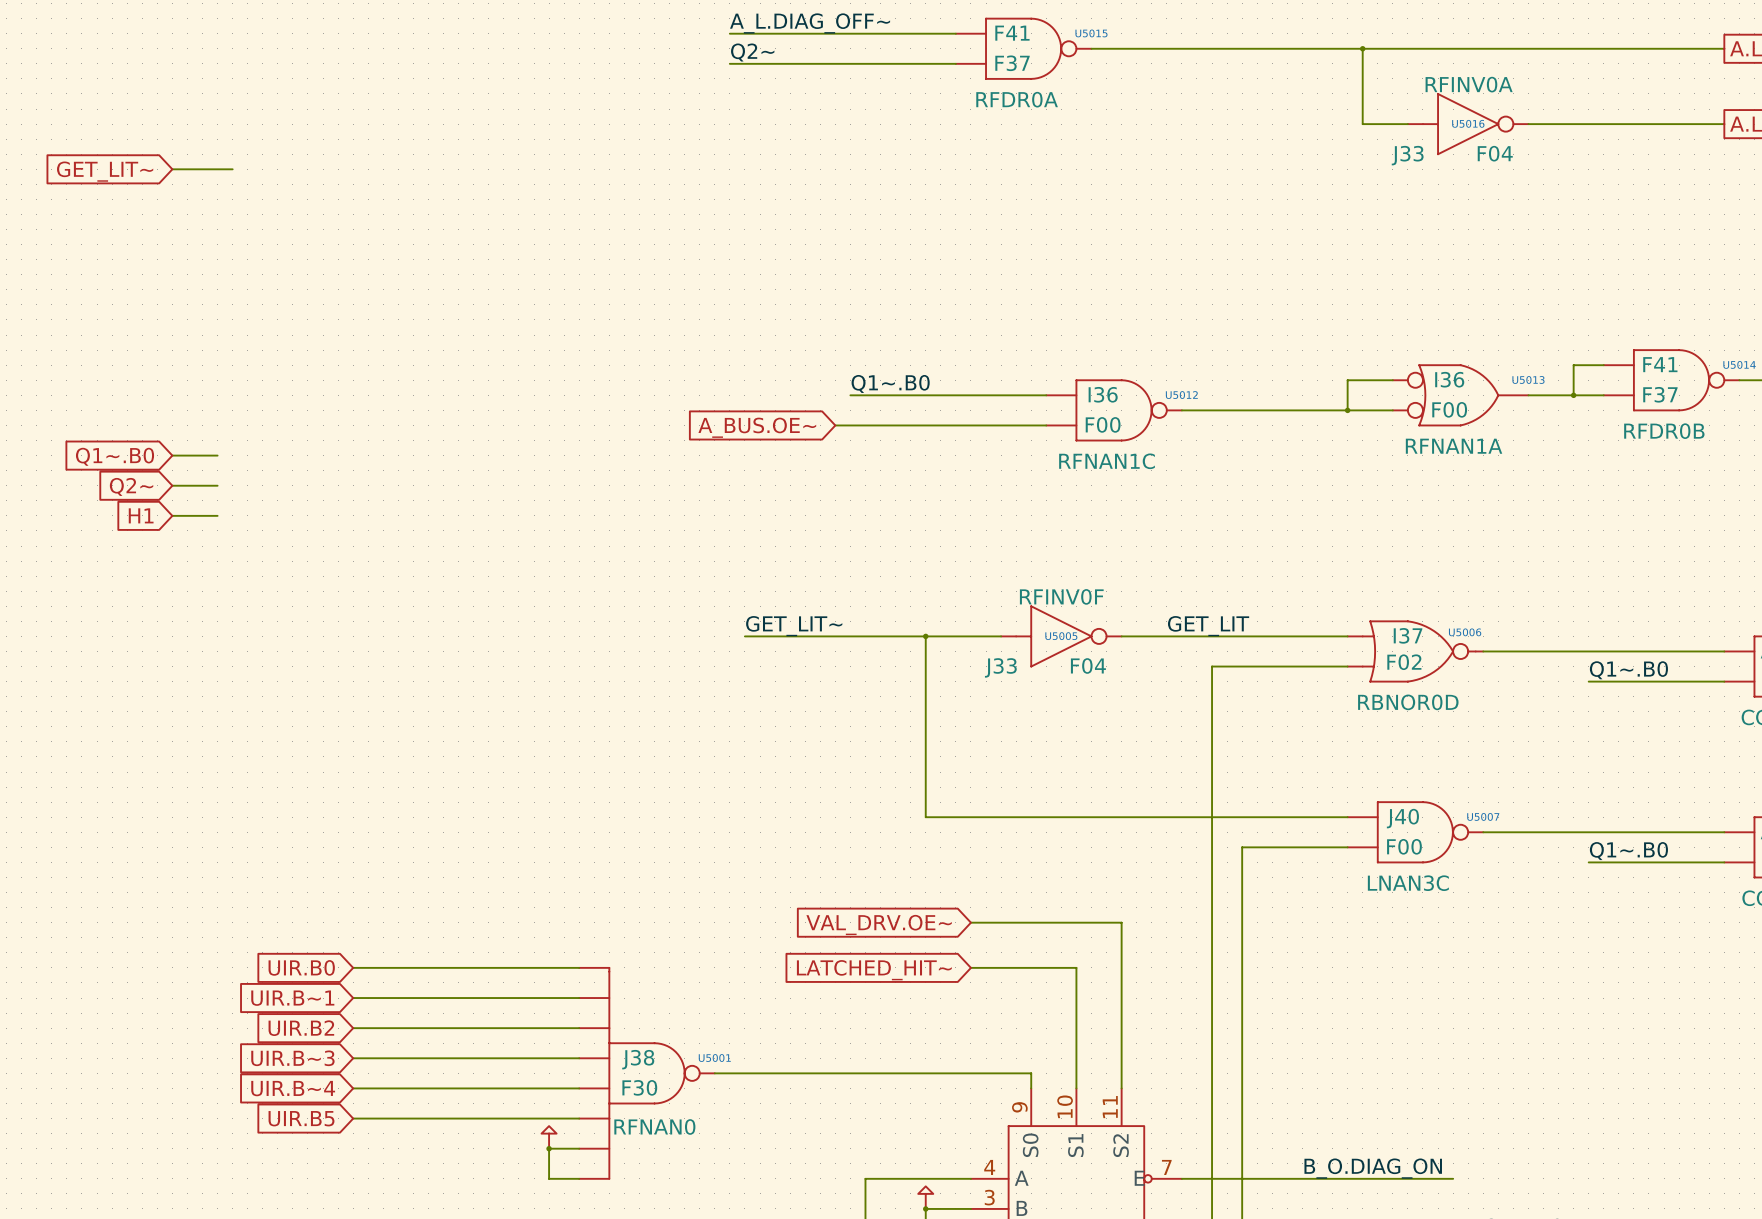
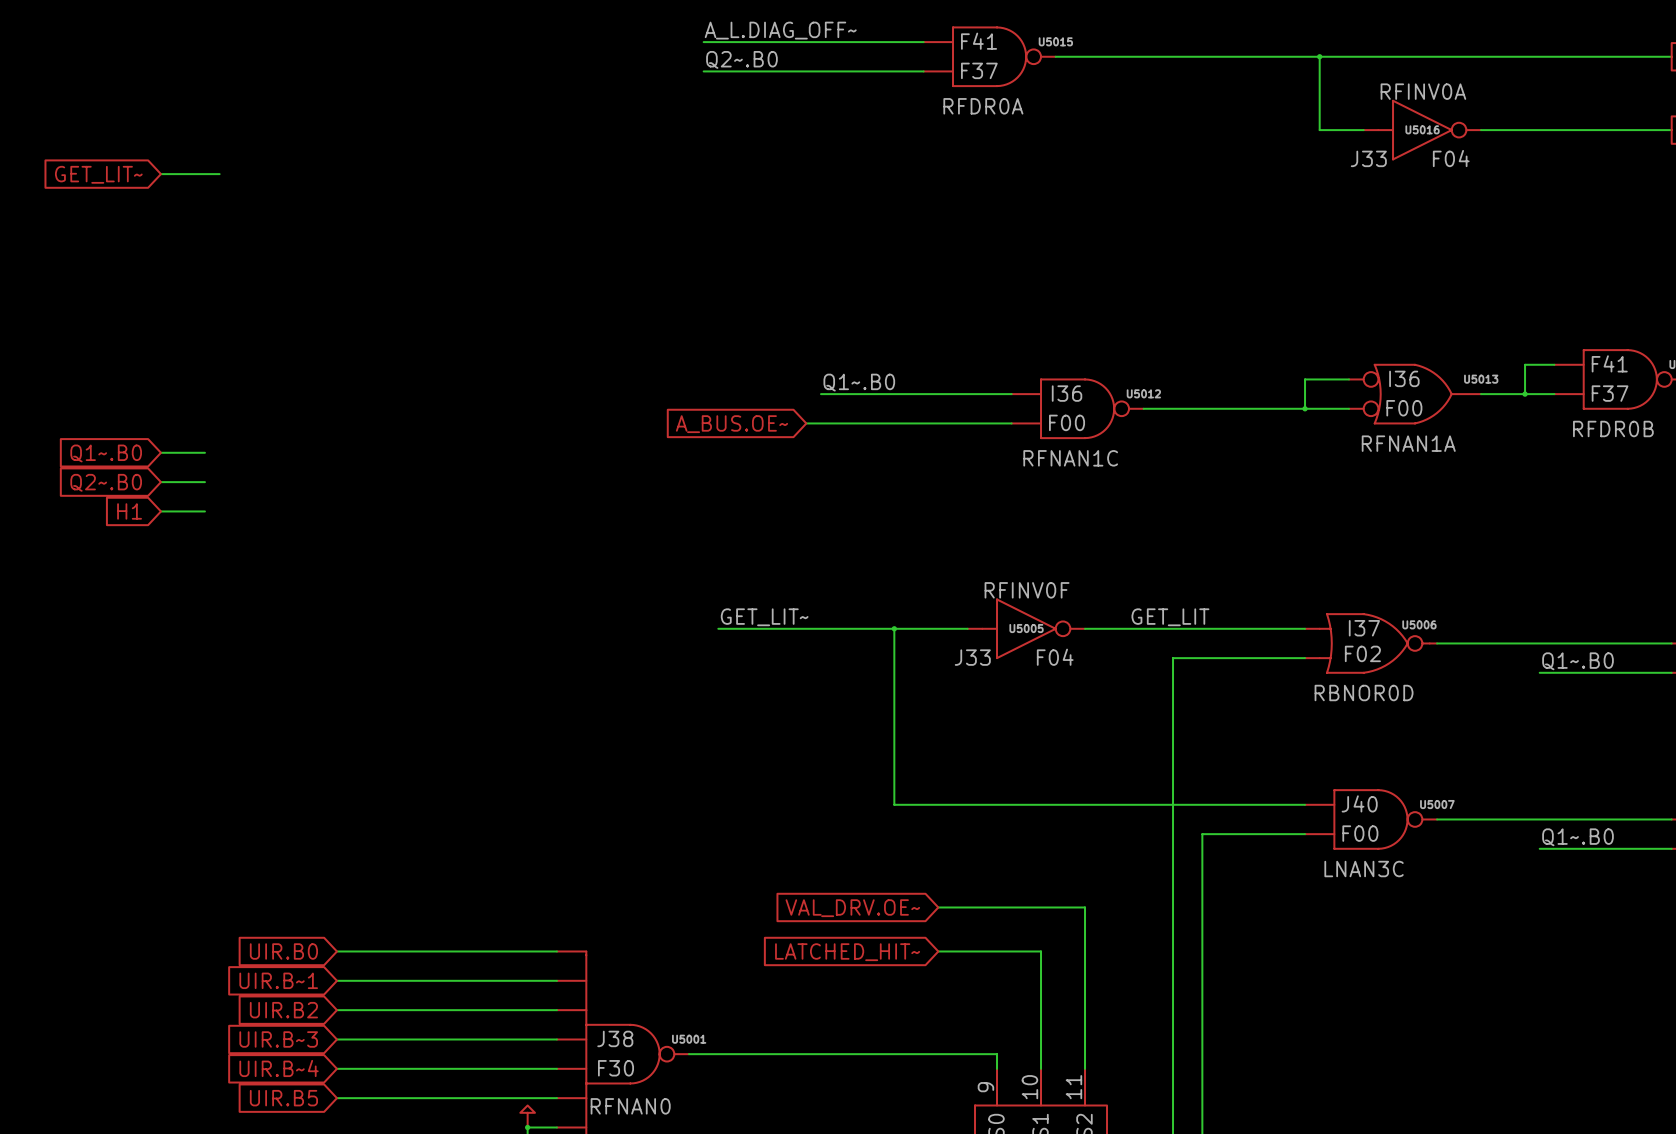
label: Q2~ (752, 52) -> Q2~.B0 (741, 59)
global label: Q2~ (131, 486) -> Q2~.B0 (106, 482)

